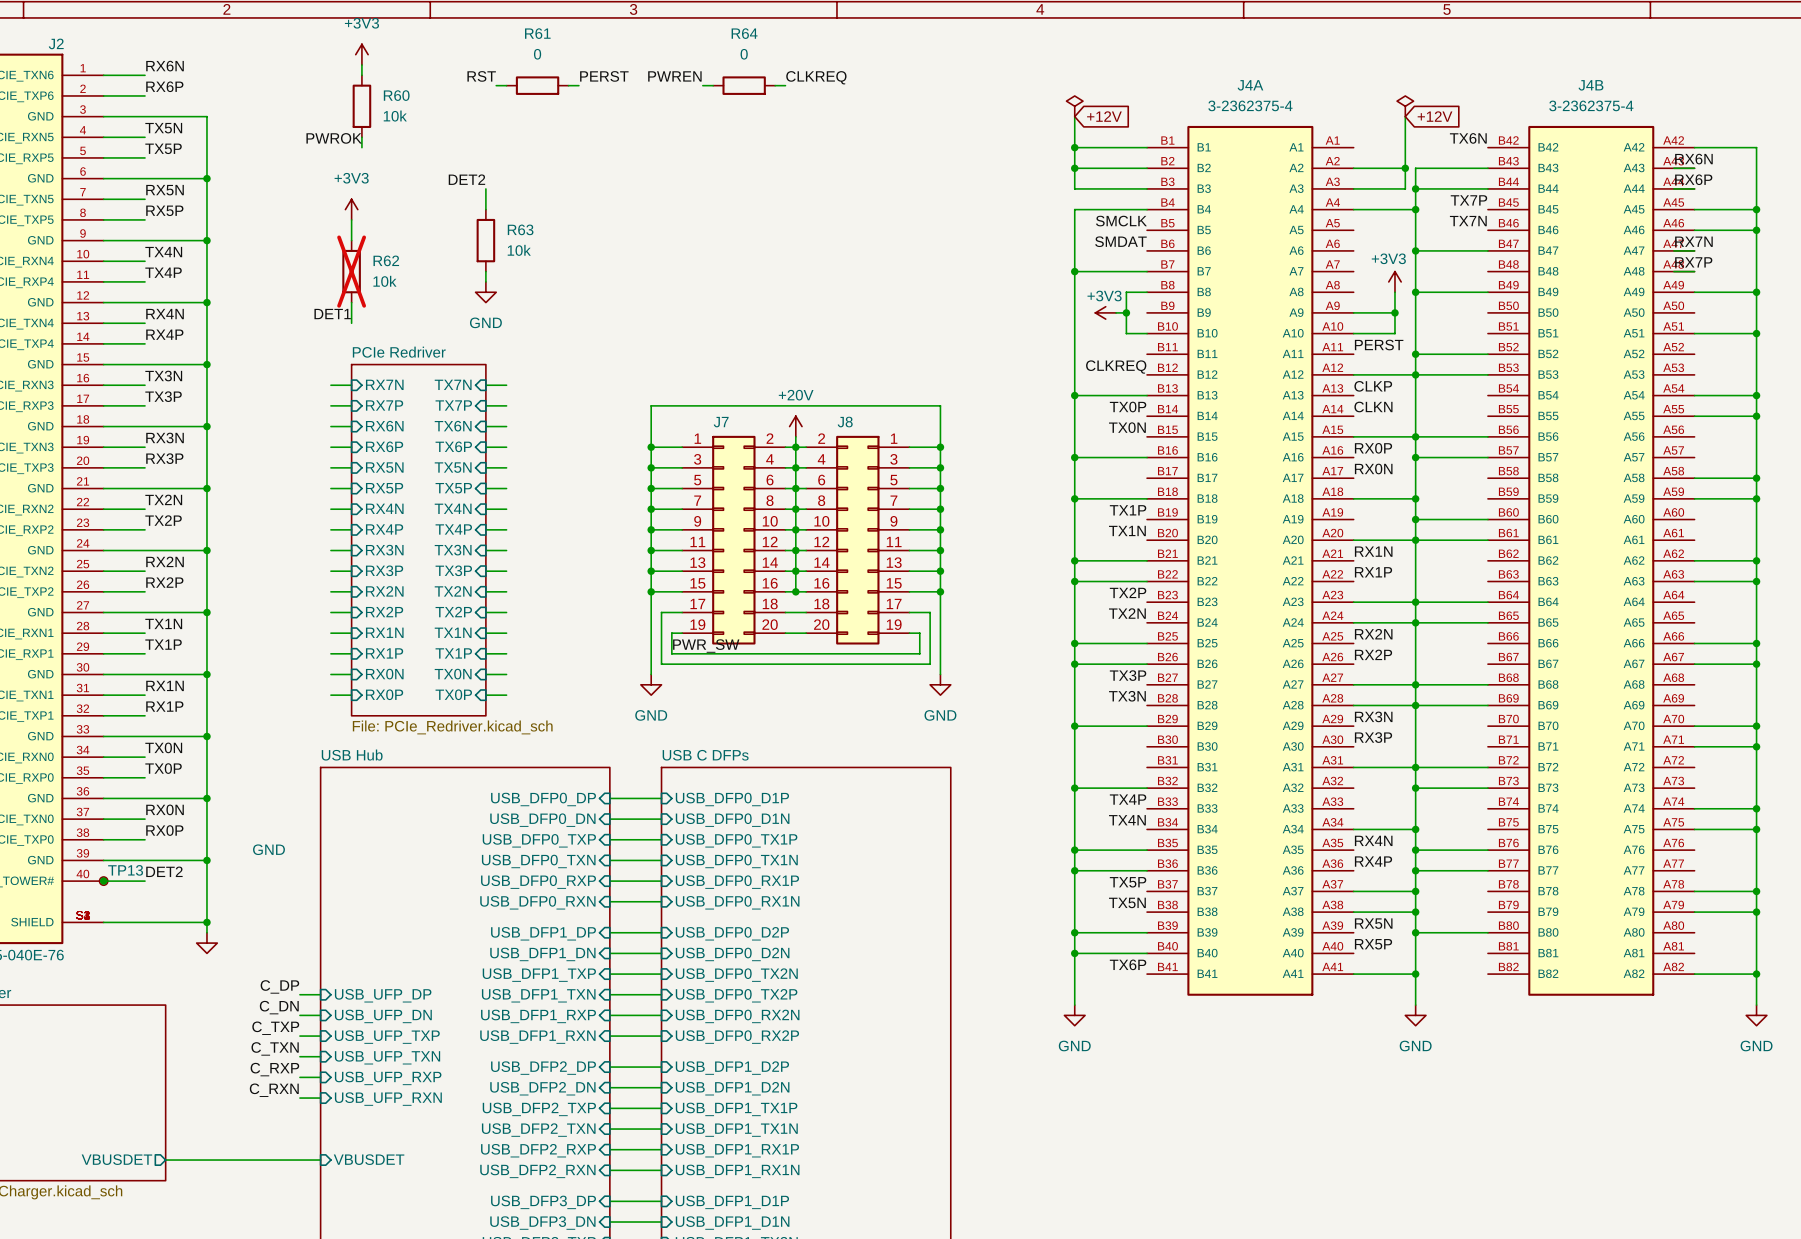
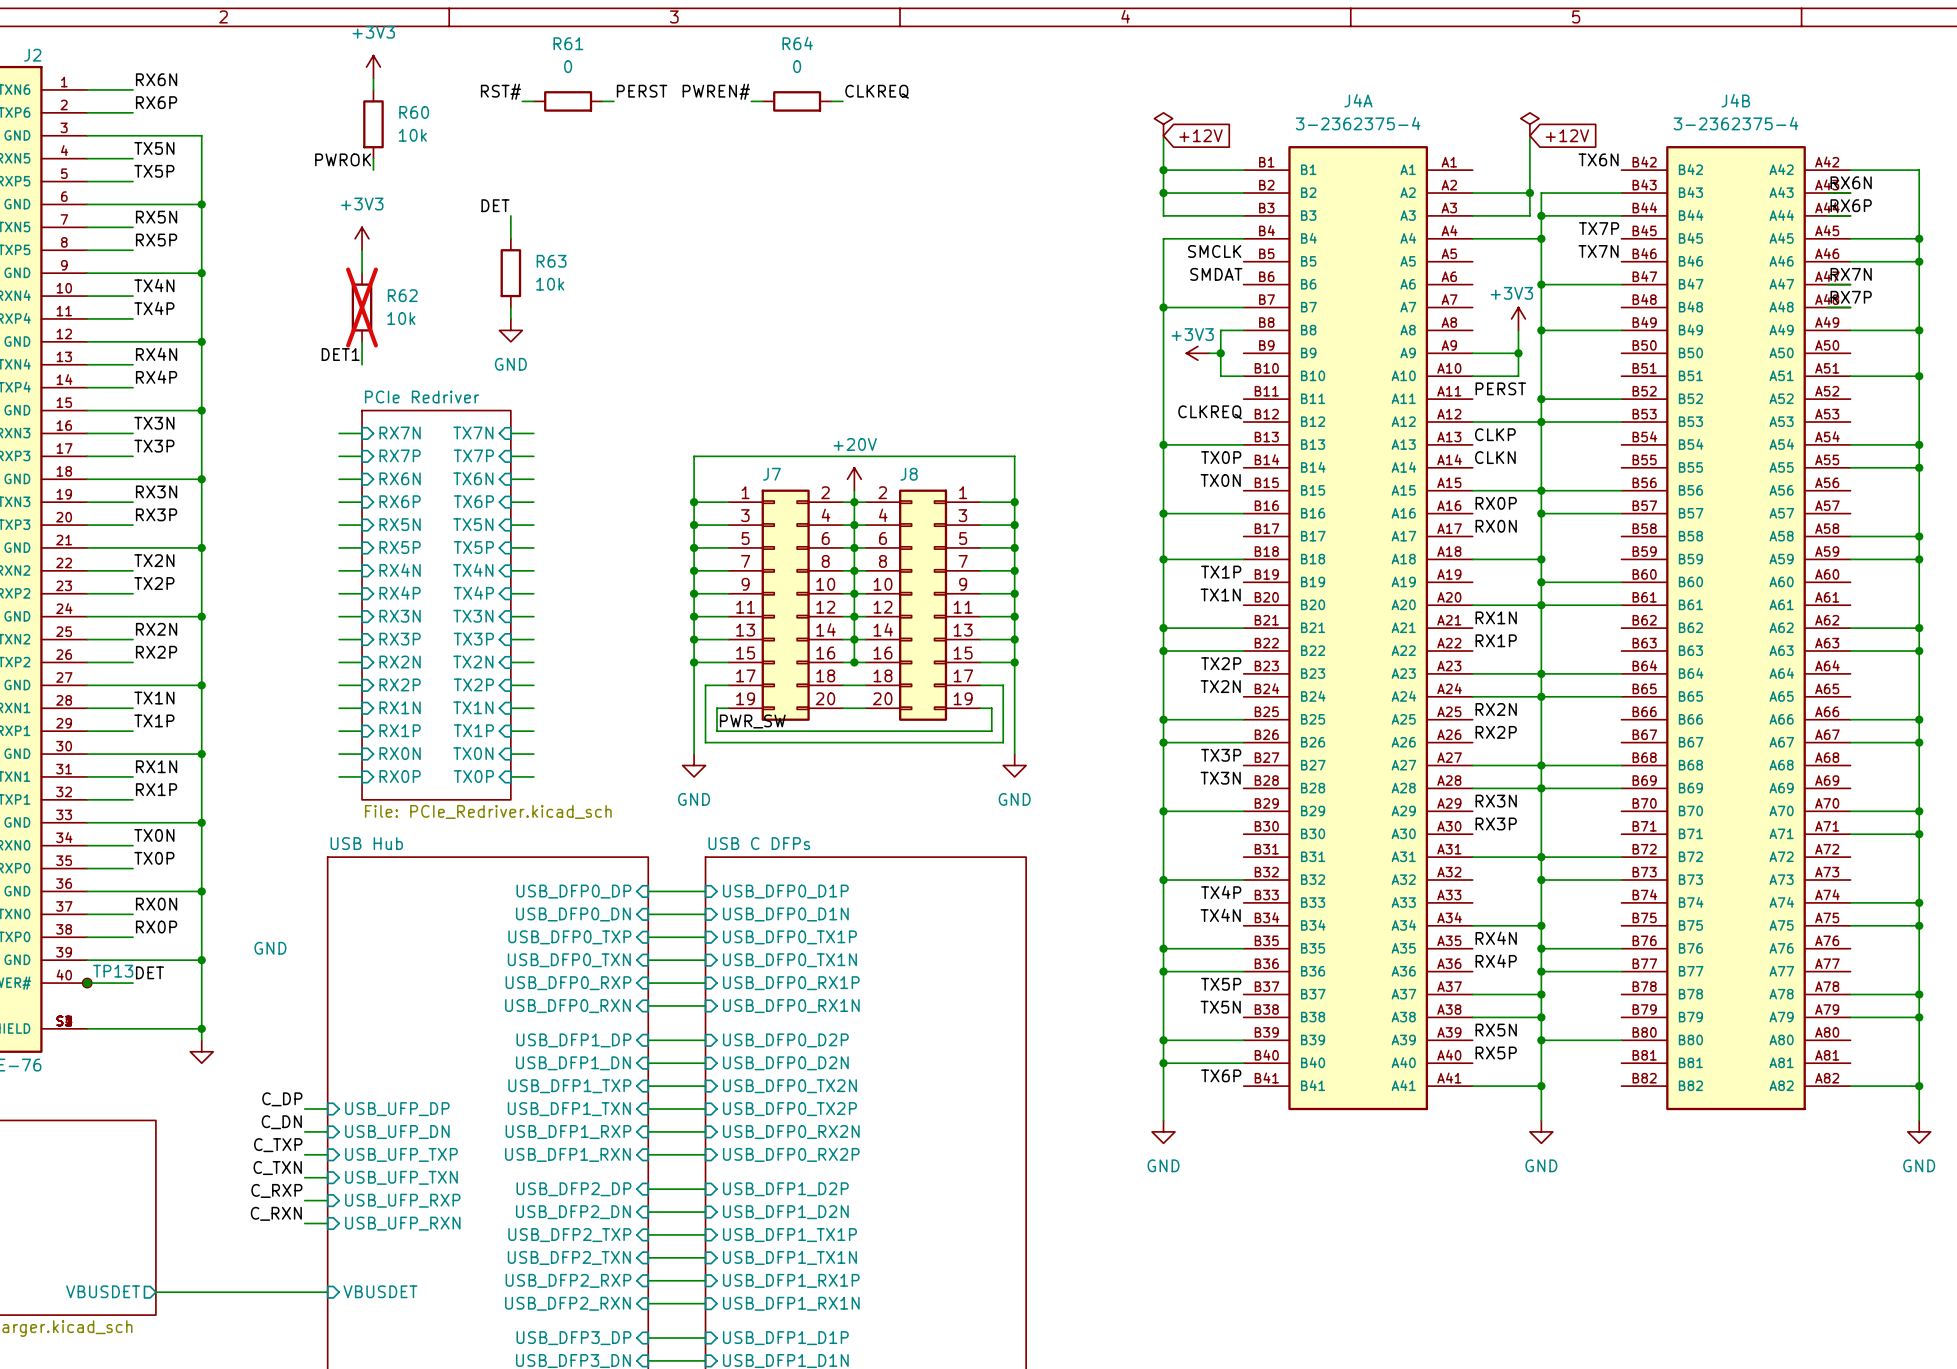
label: RST (481, 76) -> RST# (500, 91)
label: PWREN (674, 76) -> PWREN# (716, 91)
label: DET2 (466, 179) -> DET (495, 205)
label: DET2 (164, 871) -> DET (150, 972)

